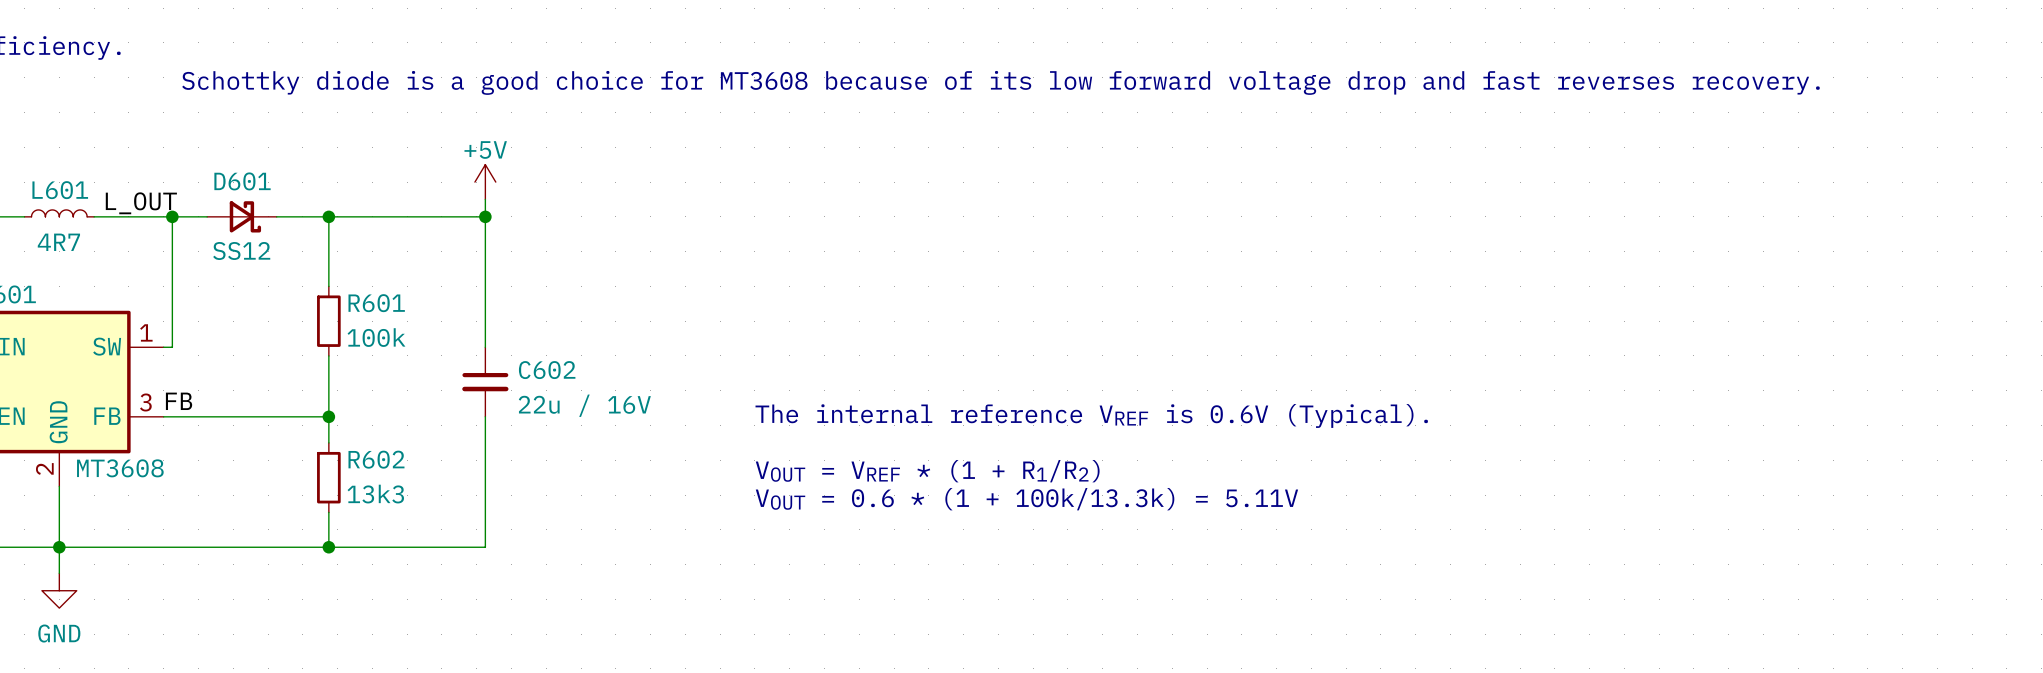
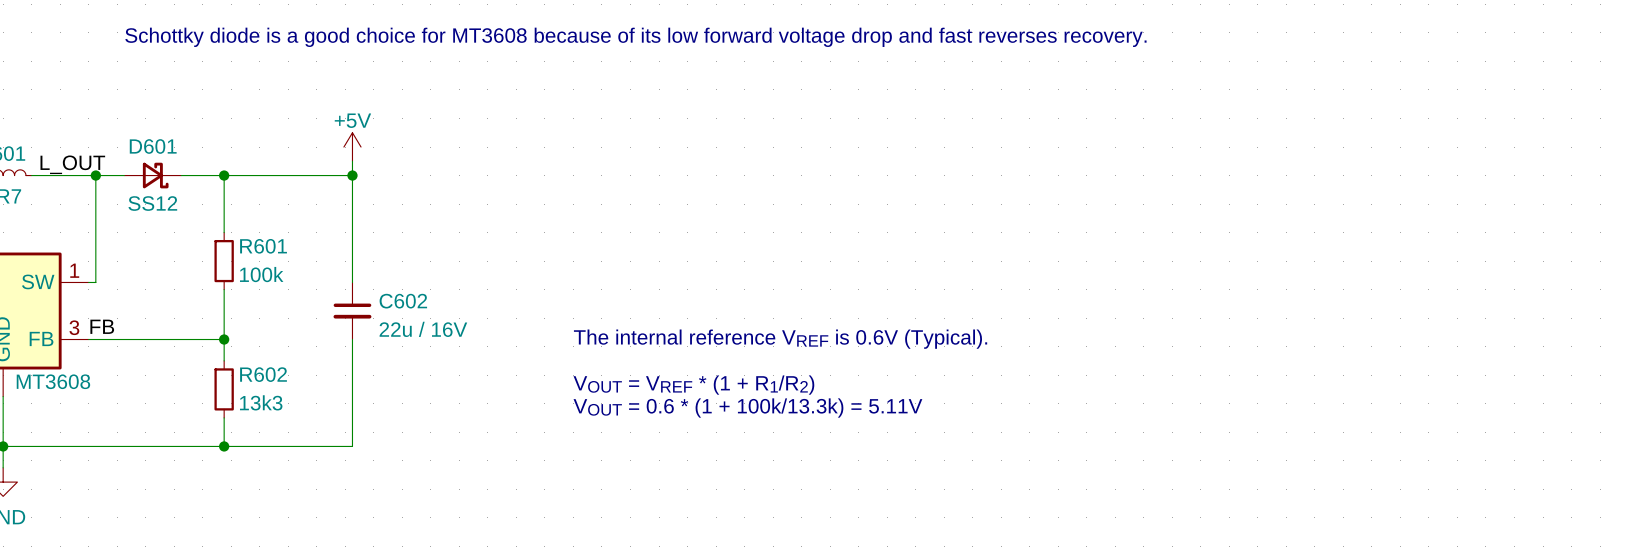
text position: Schottky diode is a good choice for MT3608 because of its low forward voltage drop and fast reverses recovery. (1000, 82) -> Schottky diode is a good choice for MT3608 because of its low forward voltage drop and fast reverses recovery. (635, 37)

